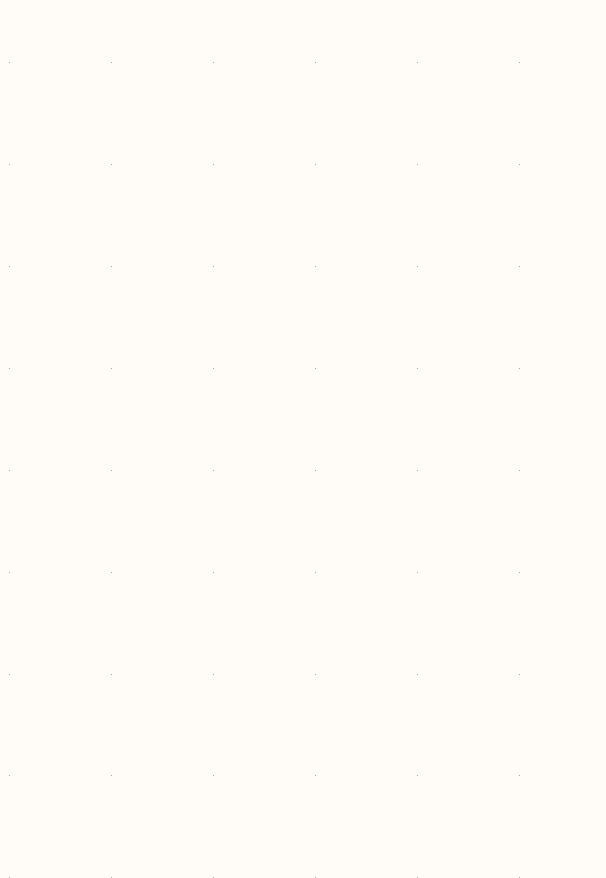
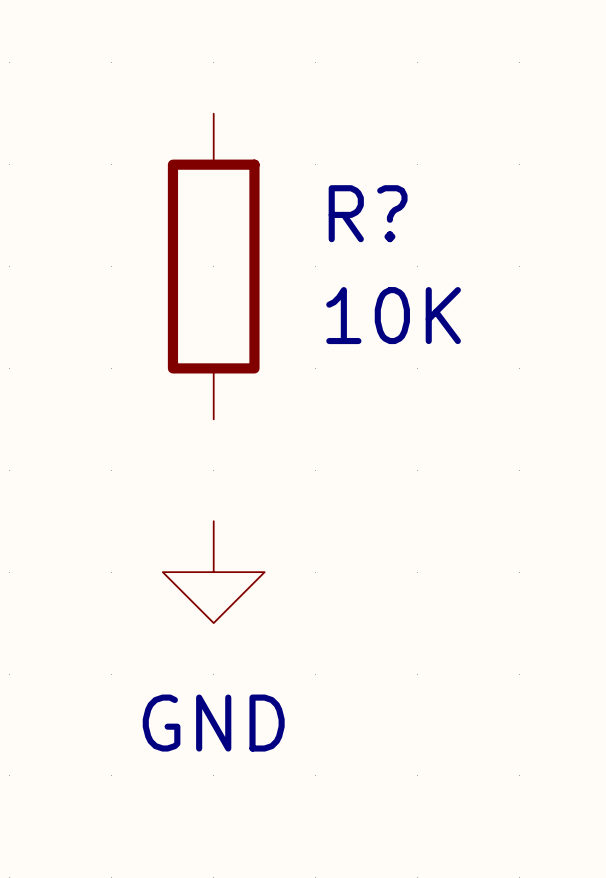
R?: none -> 10K (213, 266)
power symbol: none -> GND (213, 572)

